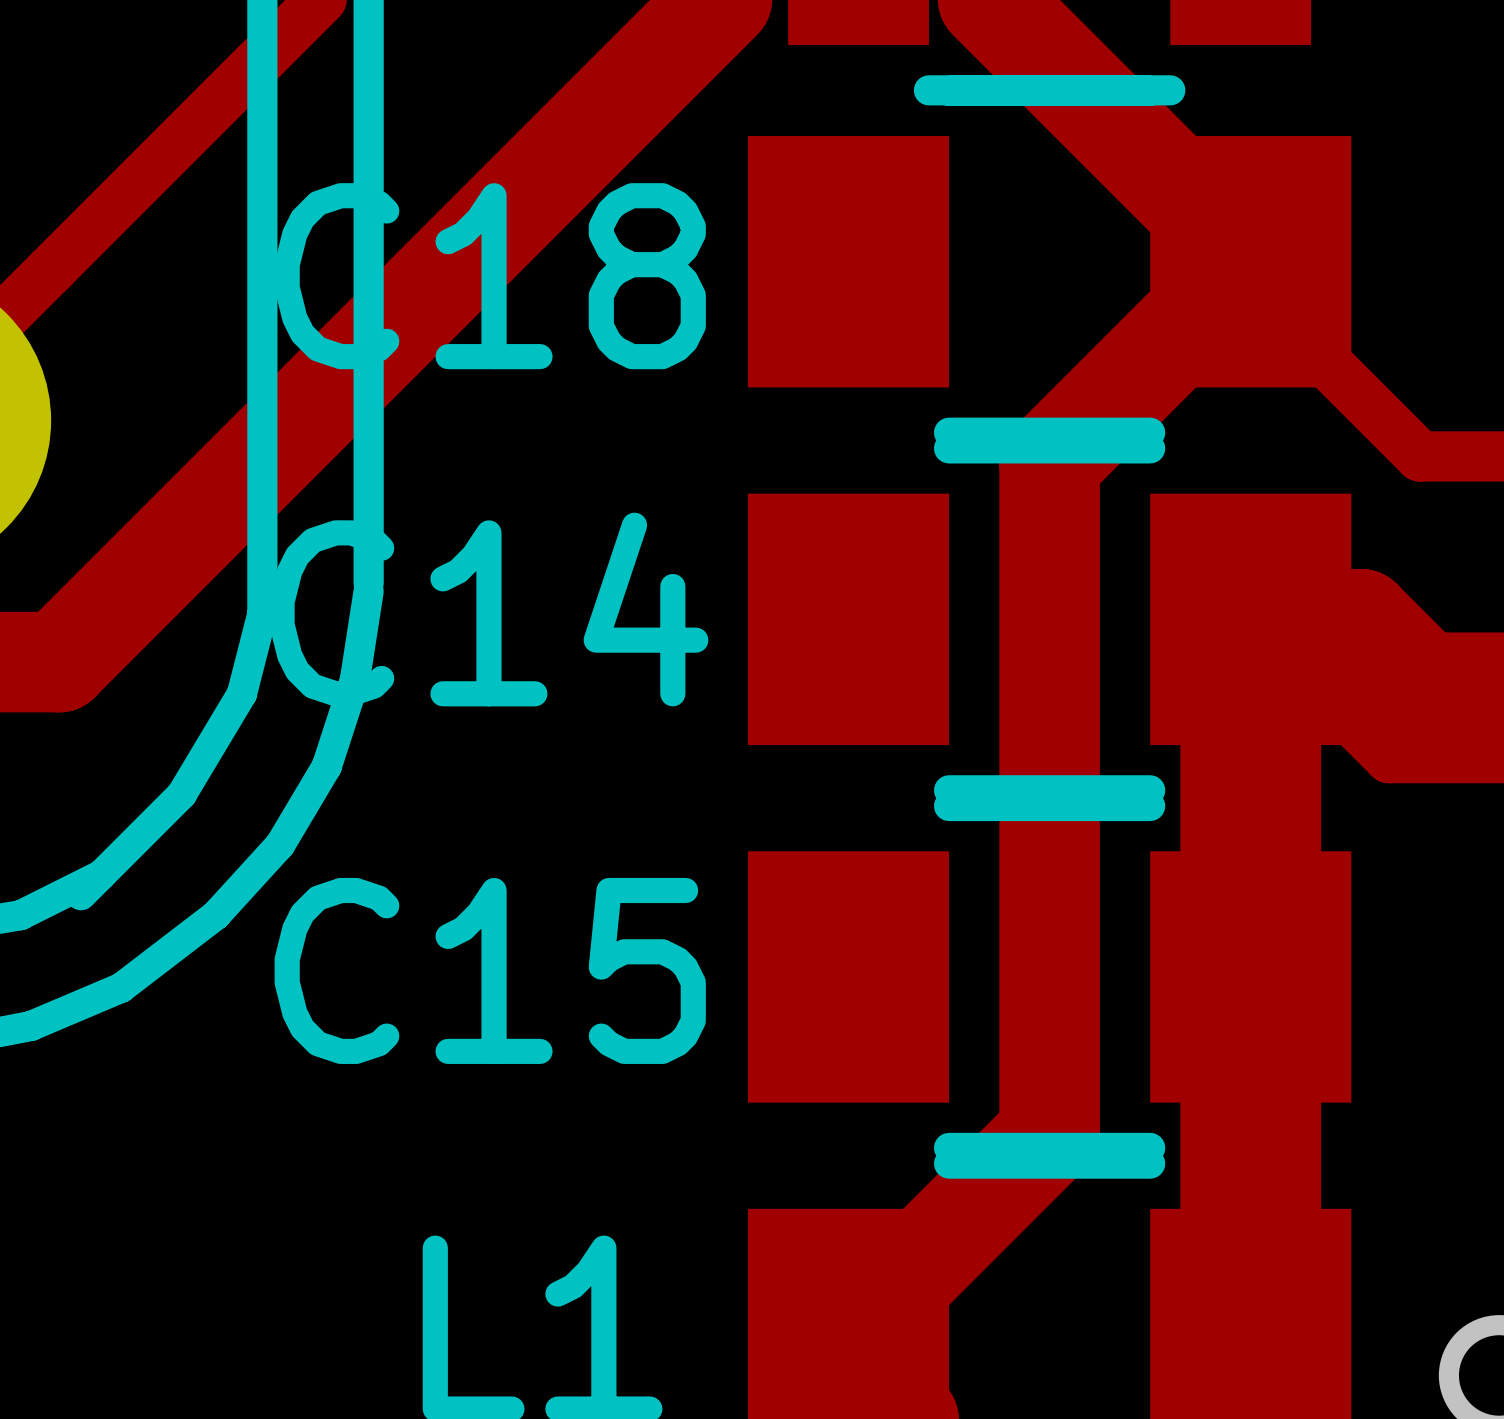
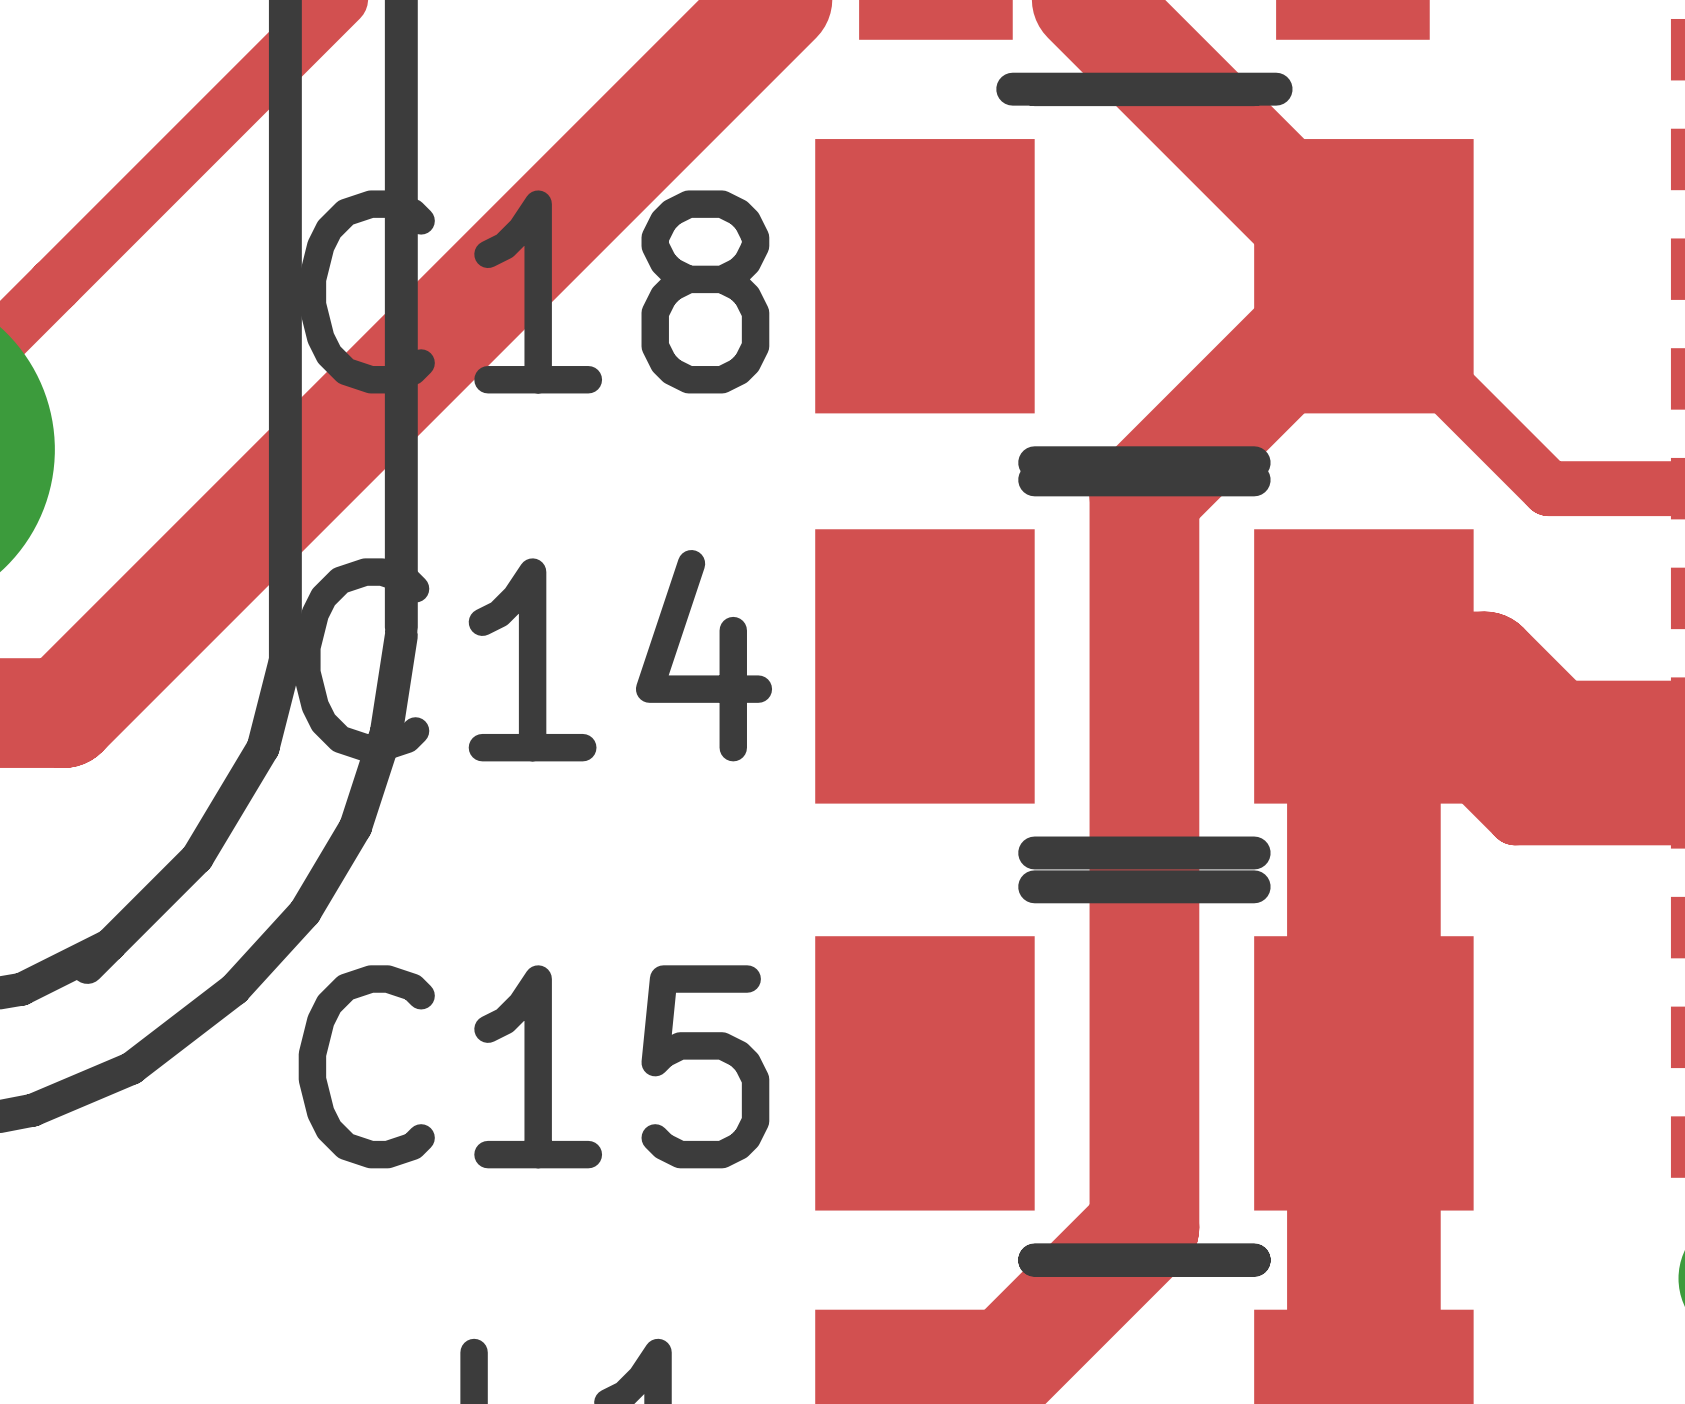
C15 position: (1049, 976) -> (1144, 1073)

